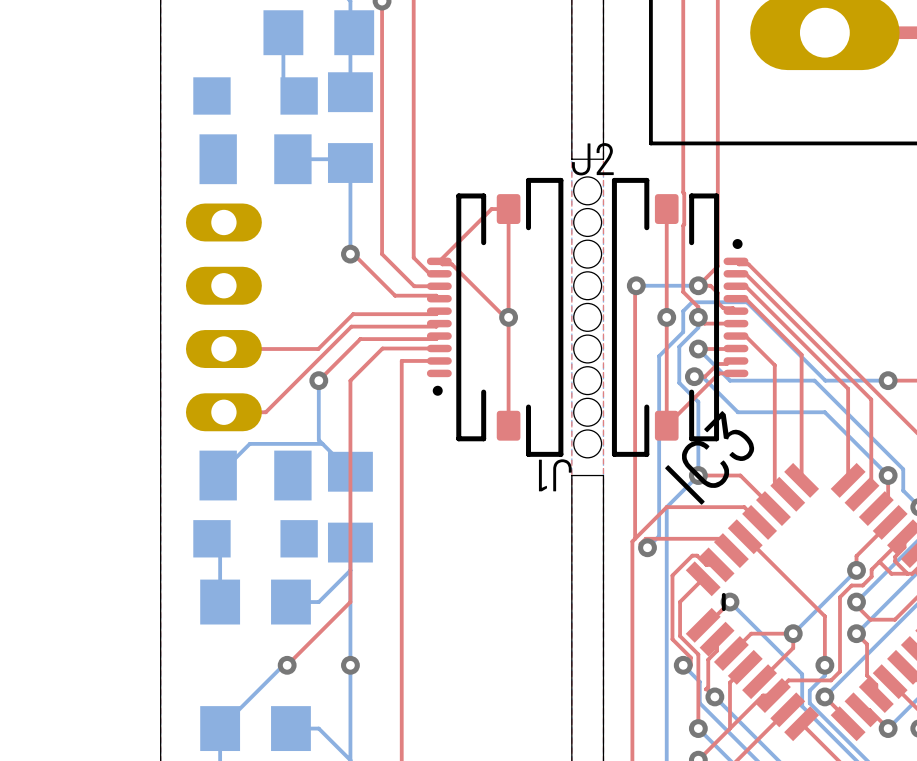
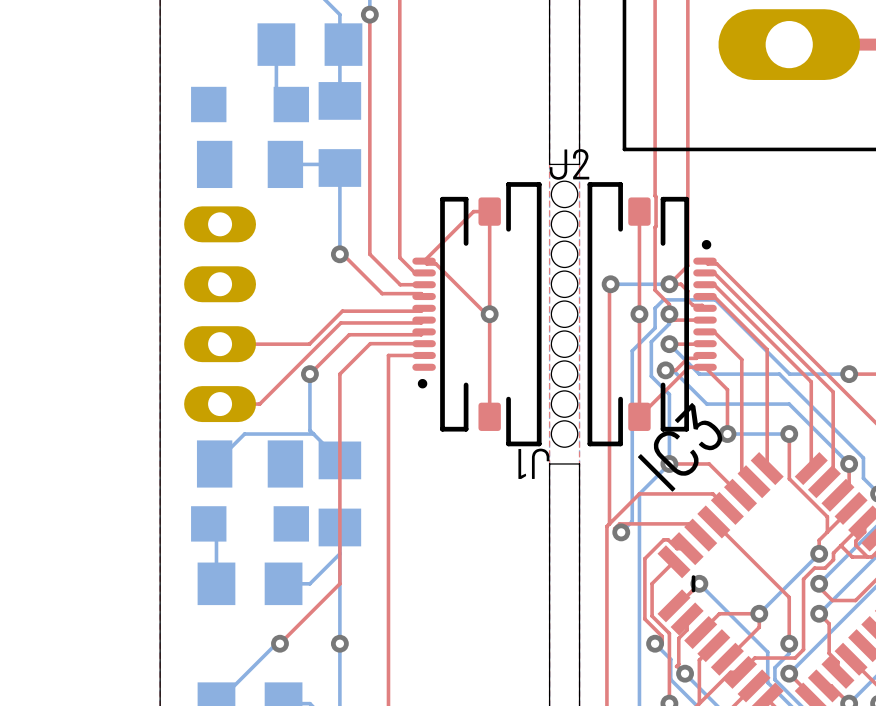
top track: none -> (705, 367) (727, 389) (727, 434)
bottom track: none -> (727, 434) (789, 434)
via: none -> (727, 434)
via: none -> (789, 434)
top track: none -> (789, 434) (789, 478) (827, 516) (827, 532)

